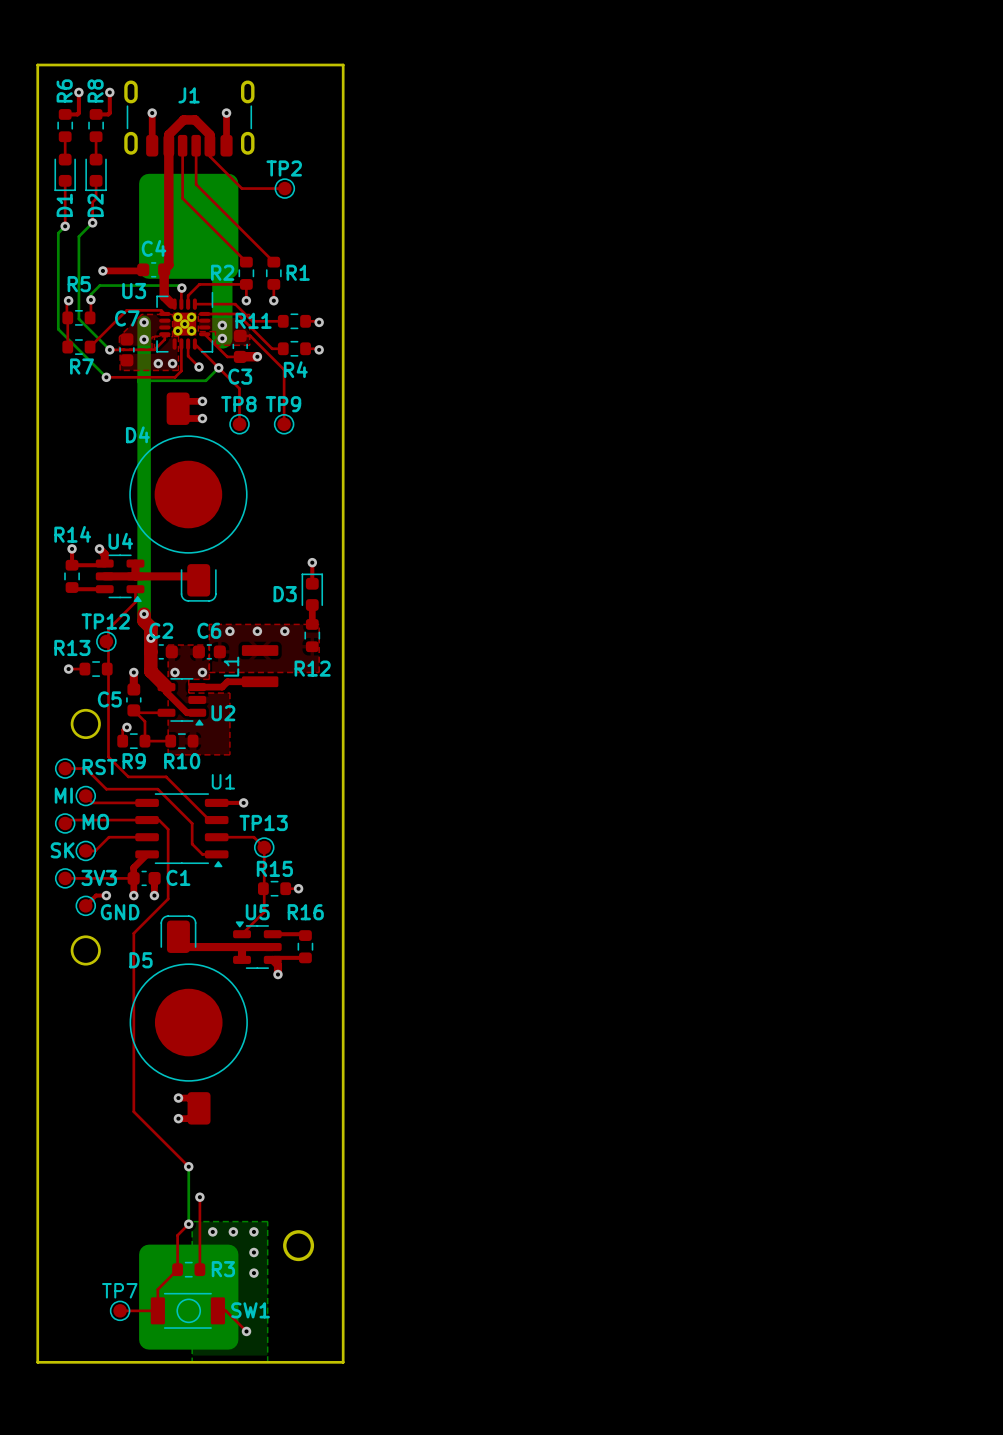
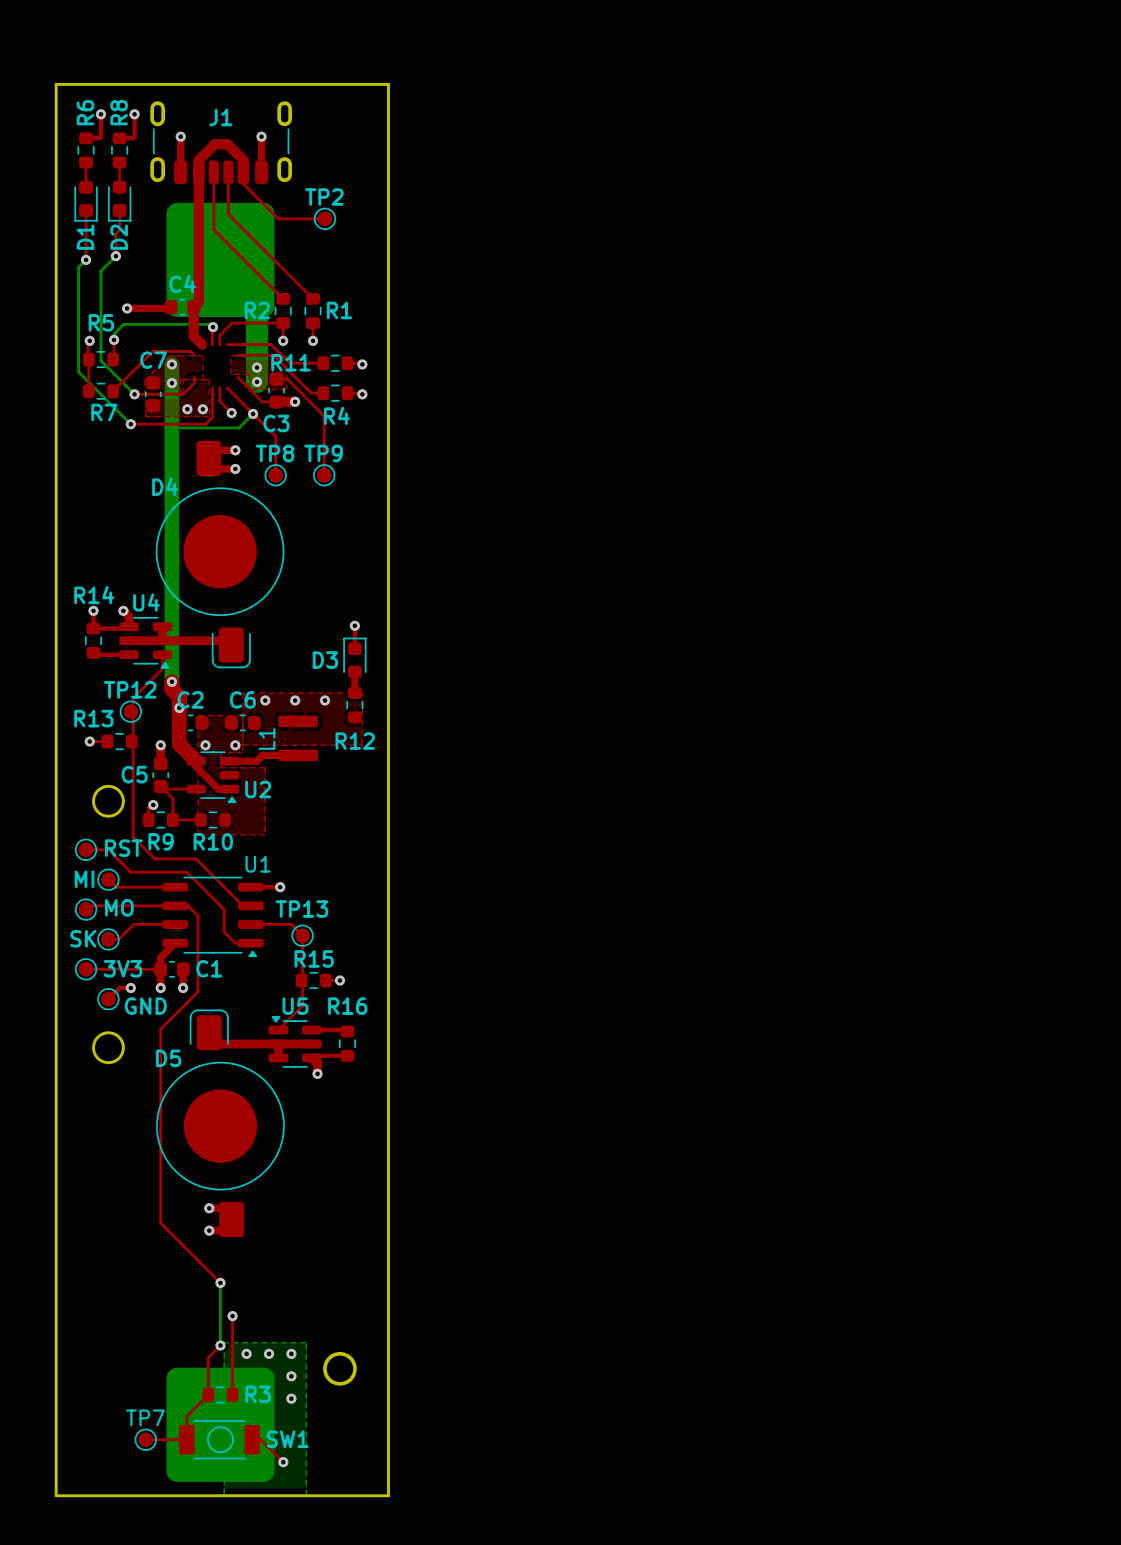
U3: (184, 322) -> none

